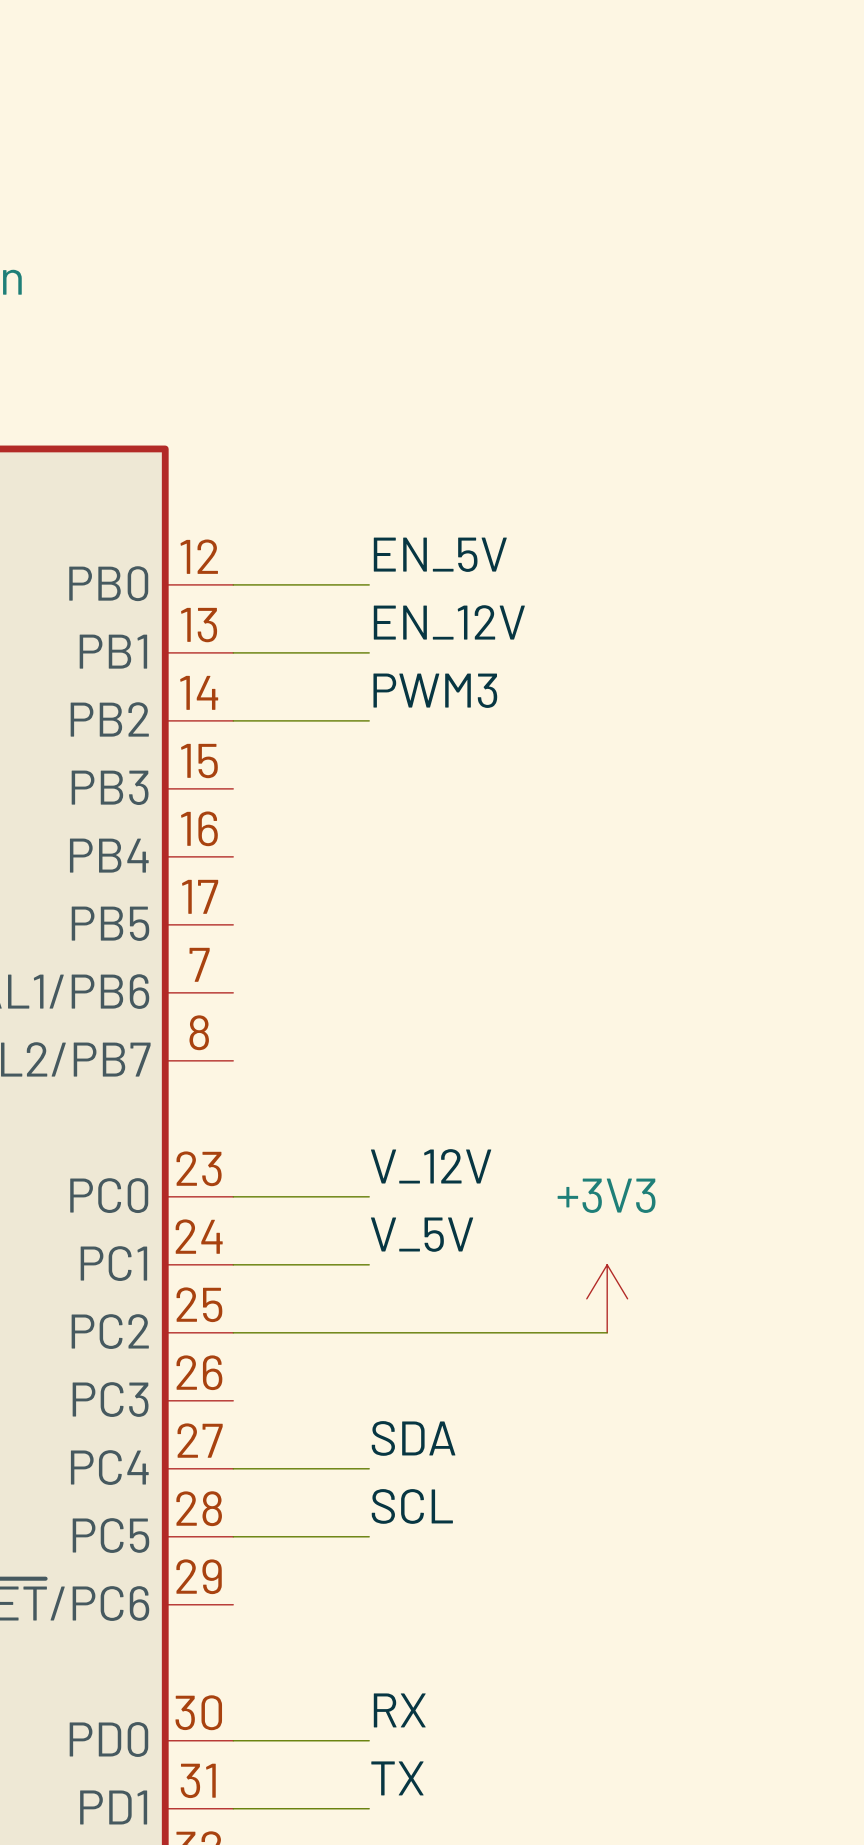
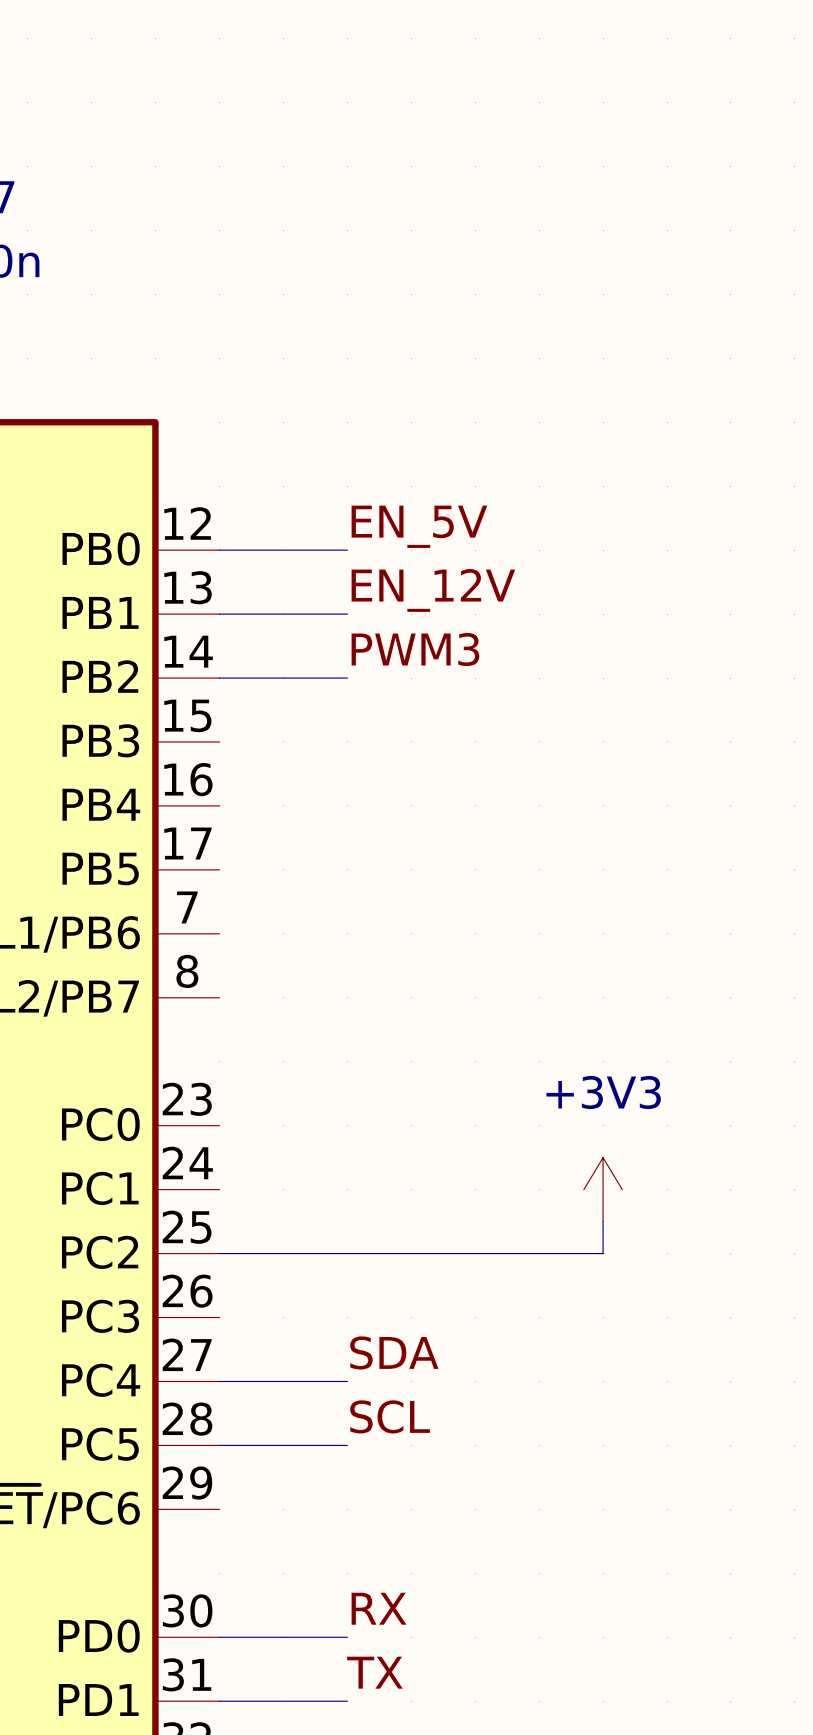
label: V_12V (431, 1166) -> none
wire: (233, 1196) (369, 1196) -> none
label: V_5V (422, 1234) -> none
wire: (233, 1264) (369, 1264) -> none
power symbol position: +3V3 (607, 1298) -> +3V3 (603, 1189)
wire: none -> (603, 1221) (603, 1253) (571, 1253)

